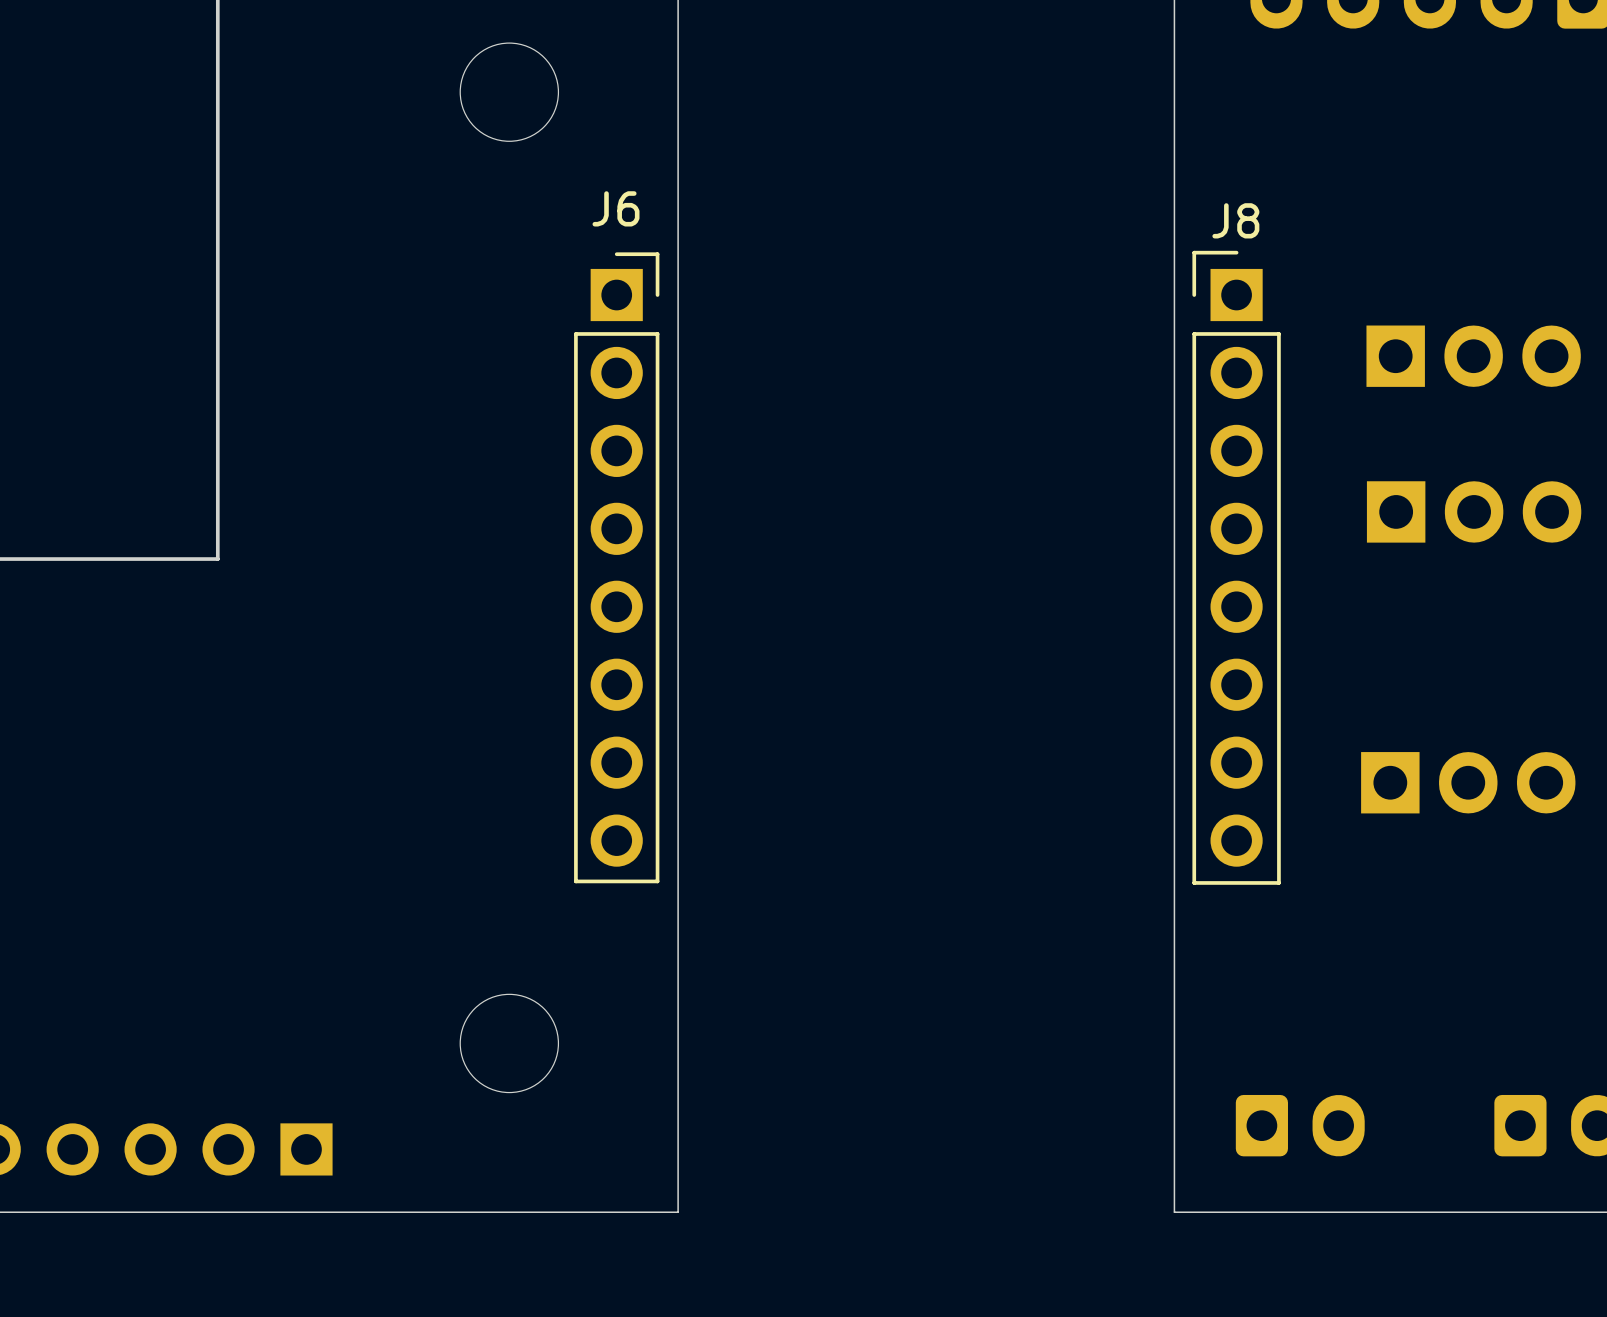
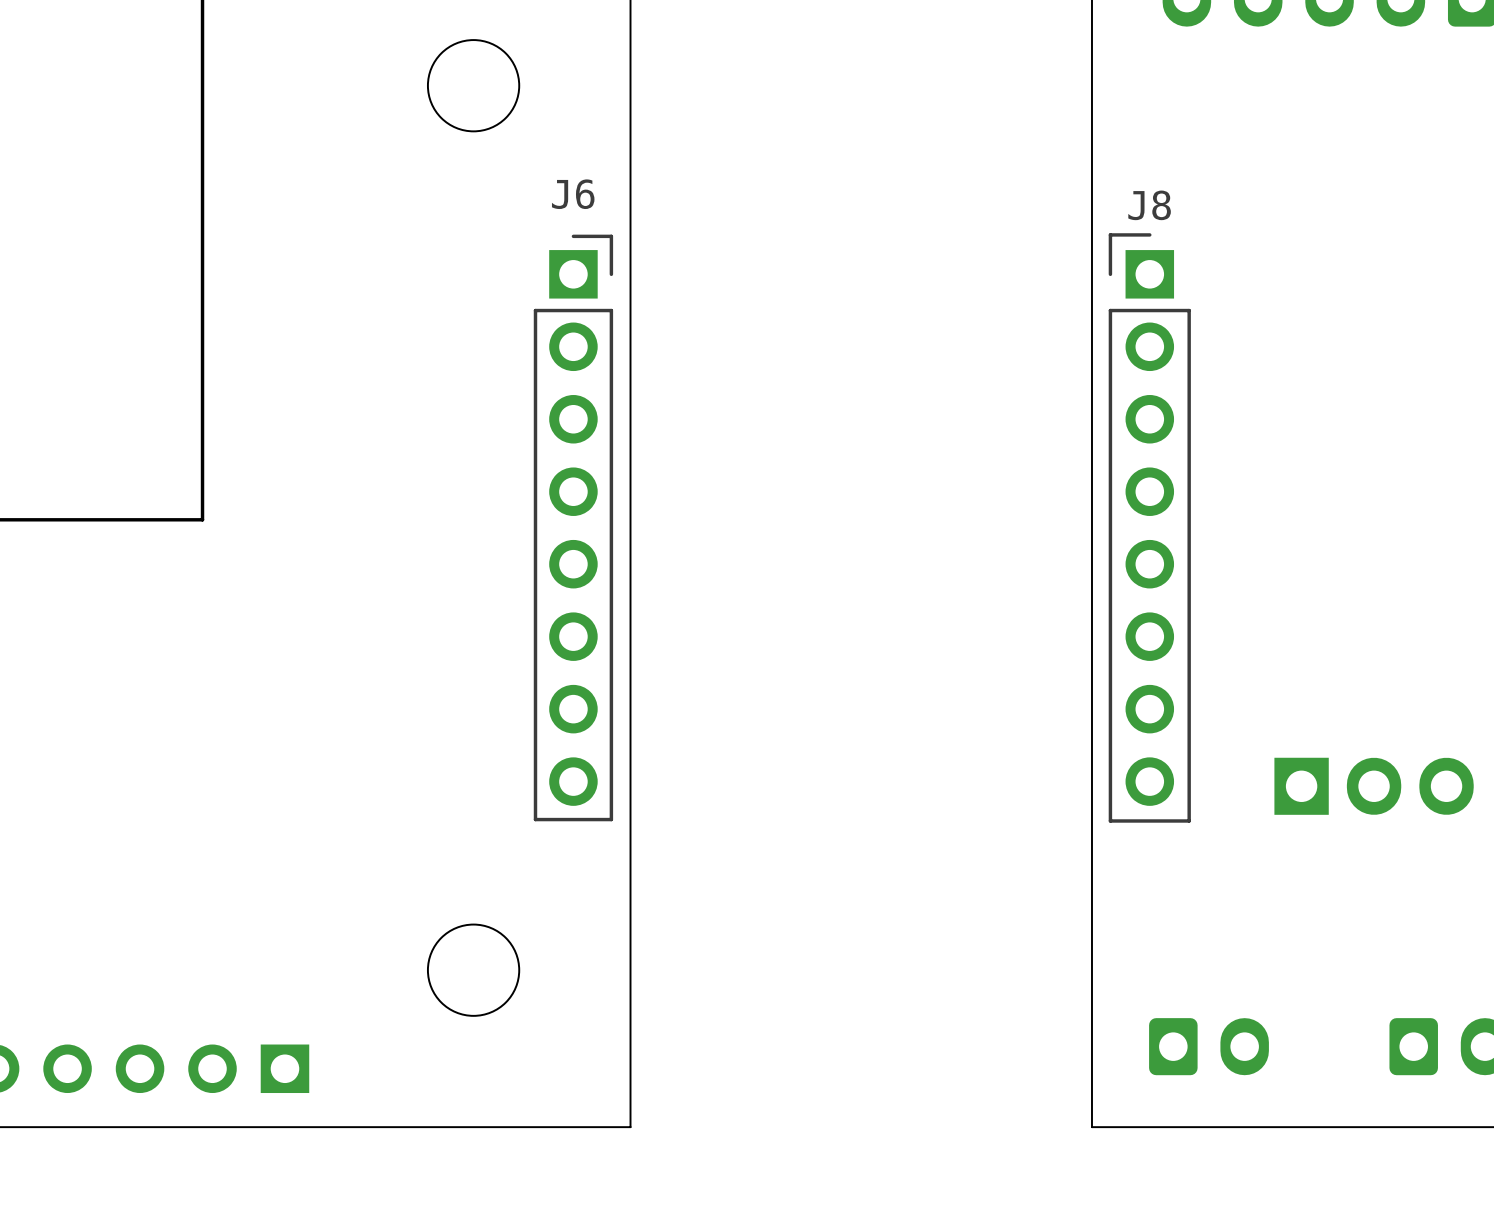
part: (1473, 356) -> none
part: (1474, 511) -> none
part position: (1468, 782) -> (1374, 786)

